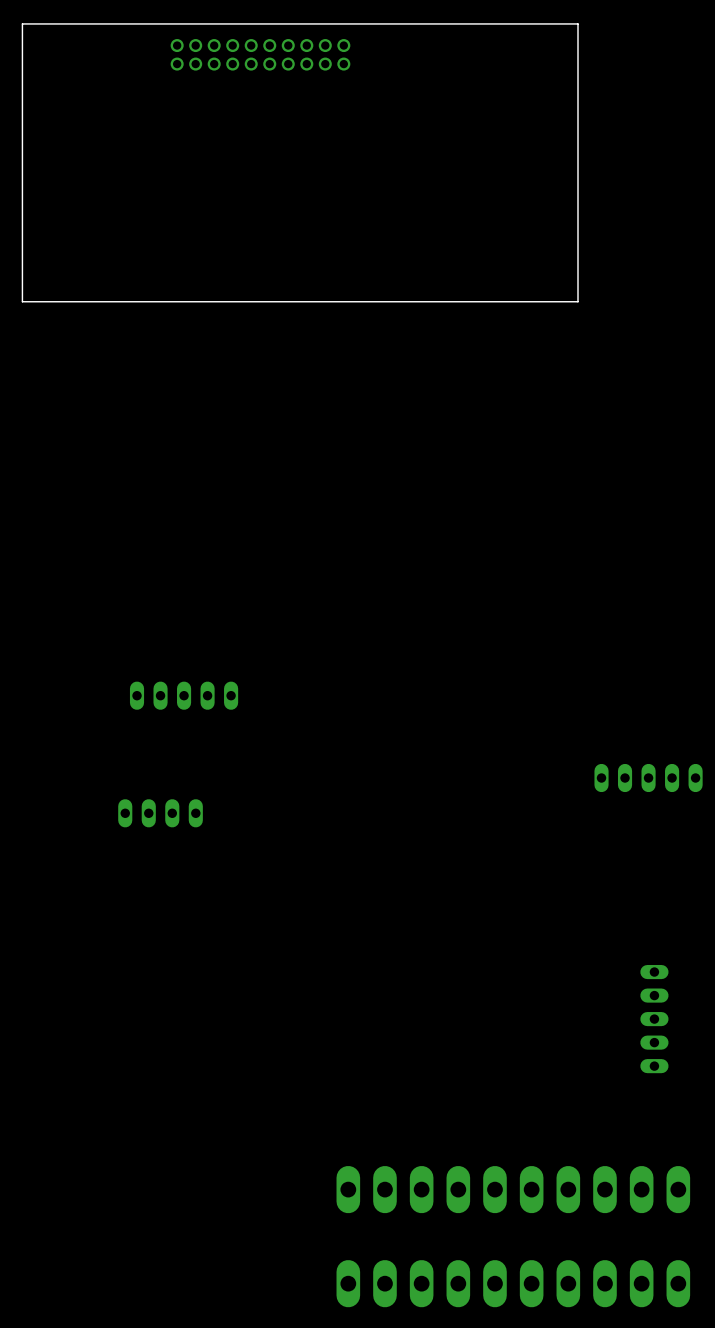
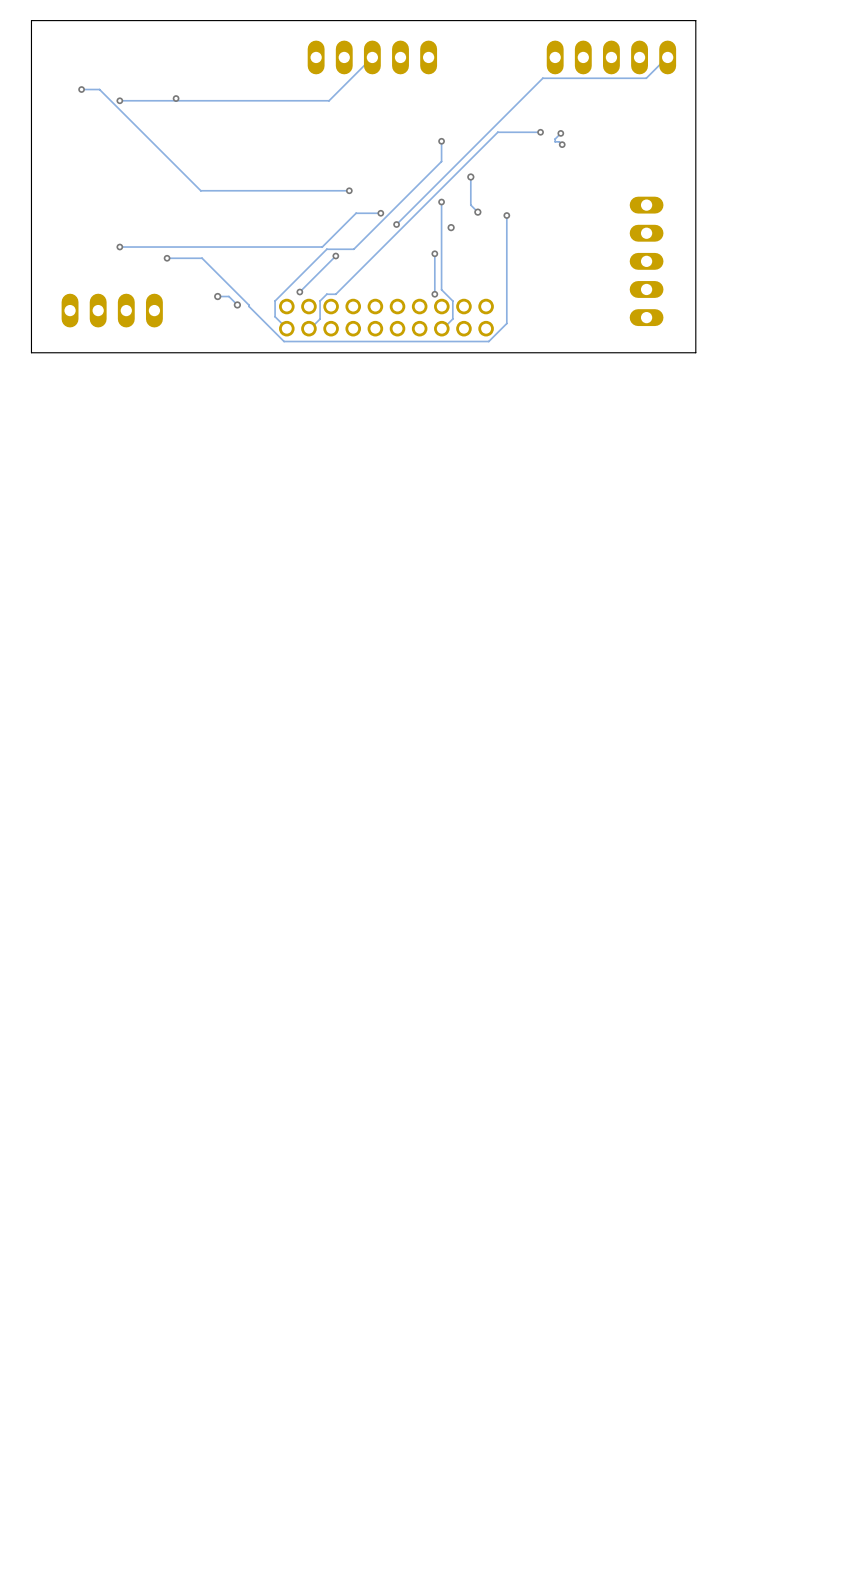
part position: (260, 54) -> (386, 317)
track: none -> (372, 57) (329, 100) (119, 100)
part: none -> (372, 57)
part: none -> (611, 57)
track: none -> (667, 57) (646, 78) (542, 78) (396, 224)
track: none -> (81, 89) (99, 89) (200, 190) (349, 190)
via: none -> (81, 89)
via: none -> (176, 98)
via: none -> (119, 100)
track: none -> (540, 132) (497, 132) (335, 294) (326, 294) (320, 301) (320, 319) (308, 328)
via: none -> (540, 132)
track: none -> (560, 133) (555, 139) (555, 141) (559, 141) (562, 144)
via: none -> (560, 133)
track: none -> (441, 141) (441, 161) (353, 249) (326, 249) (275, 301) (275, 316) (286, 328)
via: none -> (441, 141)
via: none -> (562, 144)
track: none -> (470, 176) (470, 205) (477, 212)
via: none -> (470, 176)
via: none -> (349, 190)
track: none -> (441, 202) (441, 289) (452, 301) (452, 319) (441, 328)
via: none -> (441, 202)
via: none -> (477, 212)
track: none -> (380, 213) (356, 213) (322, 247) (119, 247)
via: none -> (380, 213)
track: none -> (506, 215) (506, 323) (488, 341) (284, 341) (202, 258) (167, 258)
via: none -> (506, 215)
via: none -> (396, 224)
via: none -> (451, 227)
via: none -> (119, 247)
track: none -> (434, 253) (434, 294)
via: none -> (434, 253)
track: none -> (335, 256) (299, 292)
via: none -> (335, 256)
via: none -> (167, 258)
part: none -> (646, 261)
via: none -> (299, 292)
via: none -> (434, 294)
track: none -> (217, 296) (228, 296) (237, 304)
via: none -> (217, 296)
via: none -> (237, 304)
part: none -> (112, 310)
part: (184, 695) -> none
part: (648, 778) -> none
part: (160, 813) -> none
part: (654, 1019) -> none
part: (513, 1189) -> none
part: (513, 1283) -> none

